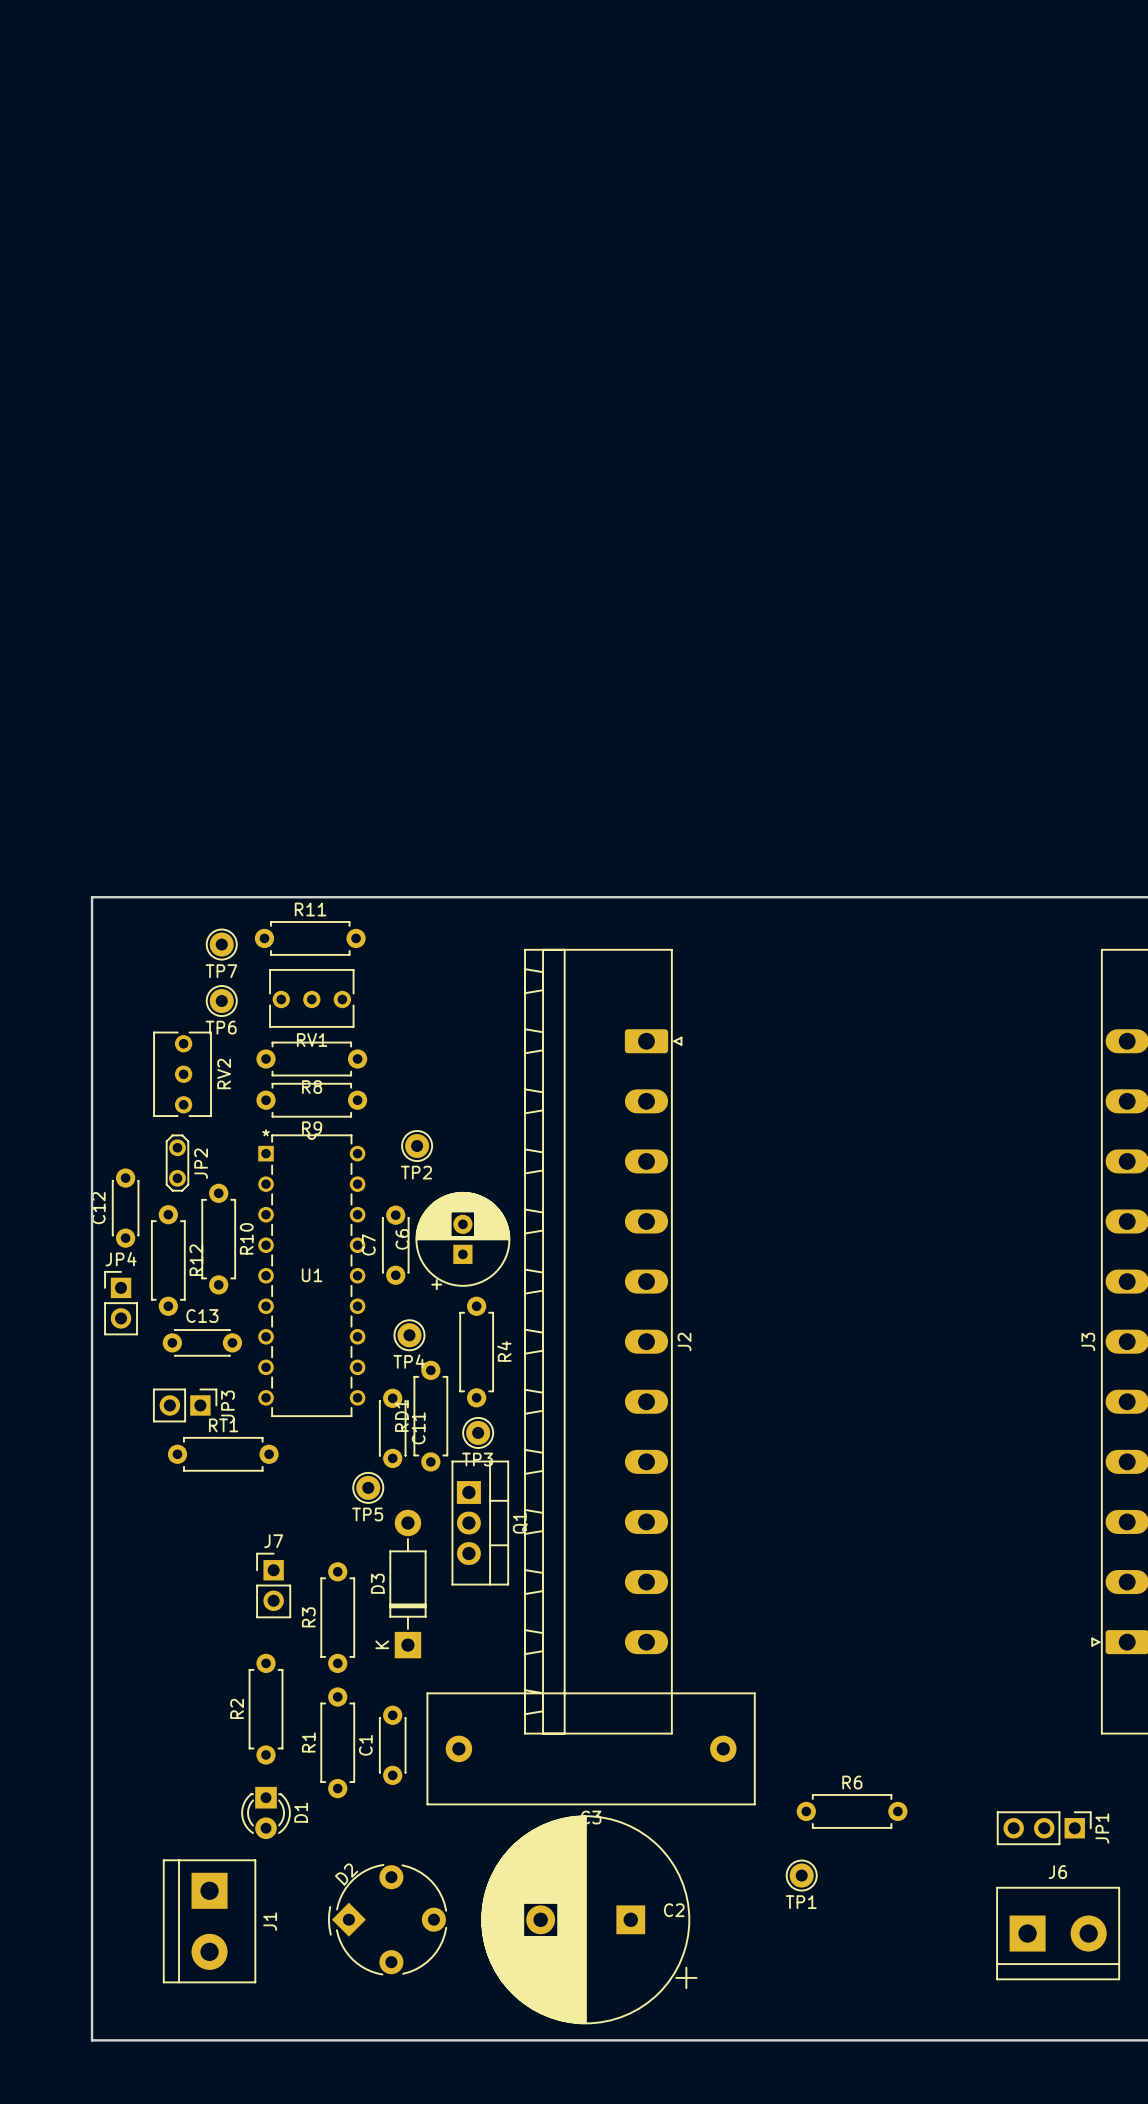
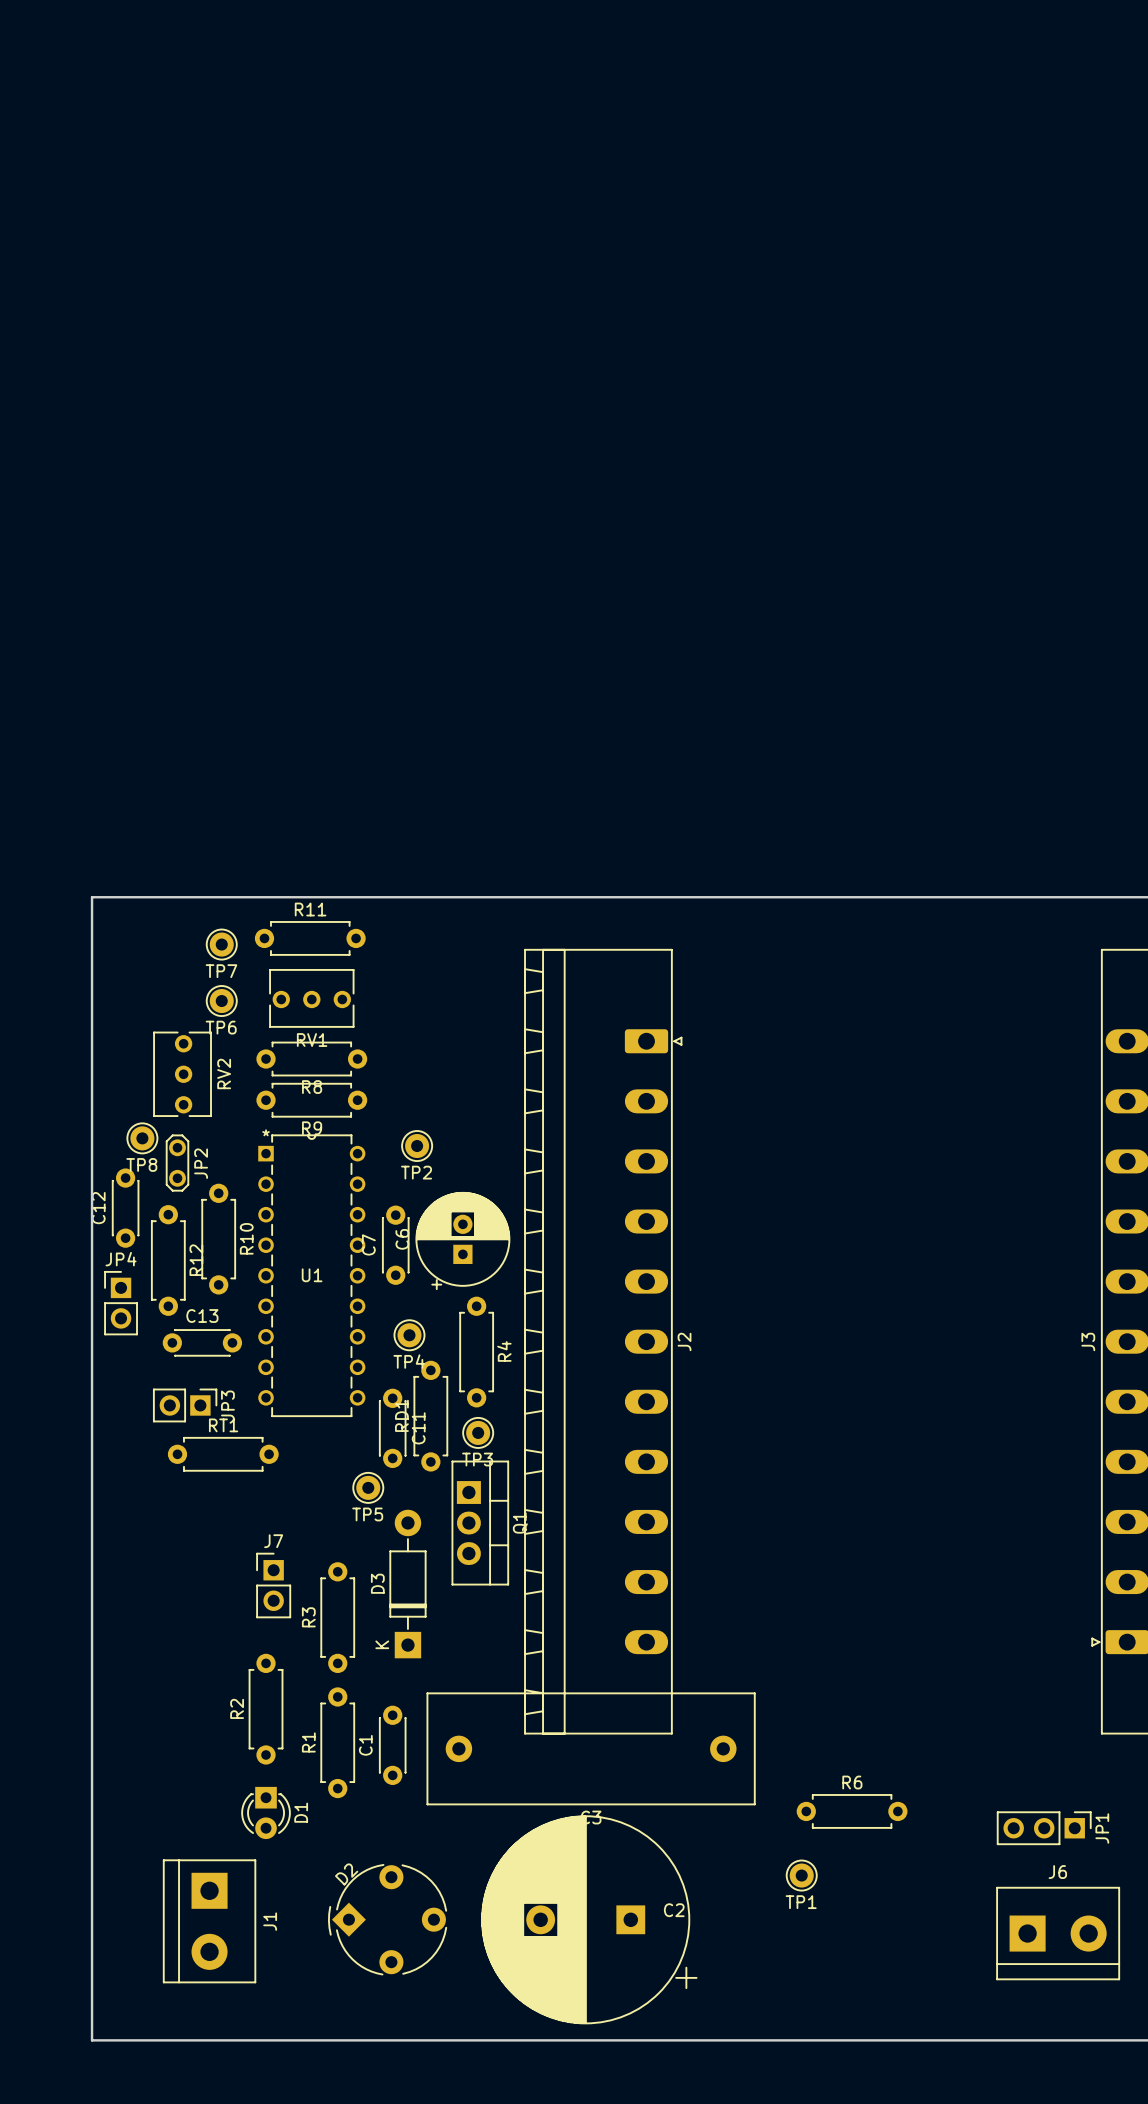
TP8: none -> (142, 1138)

